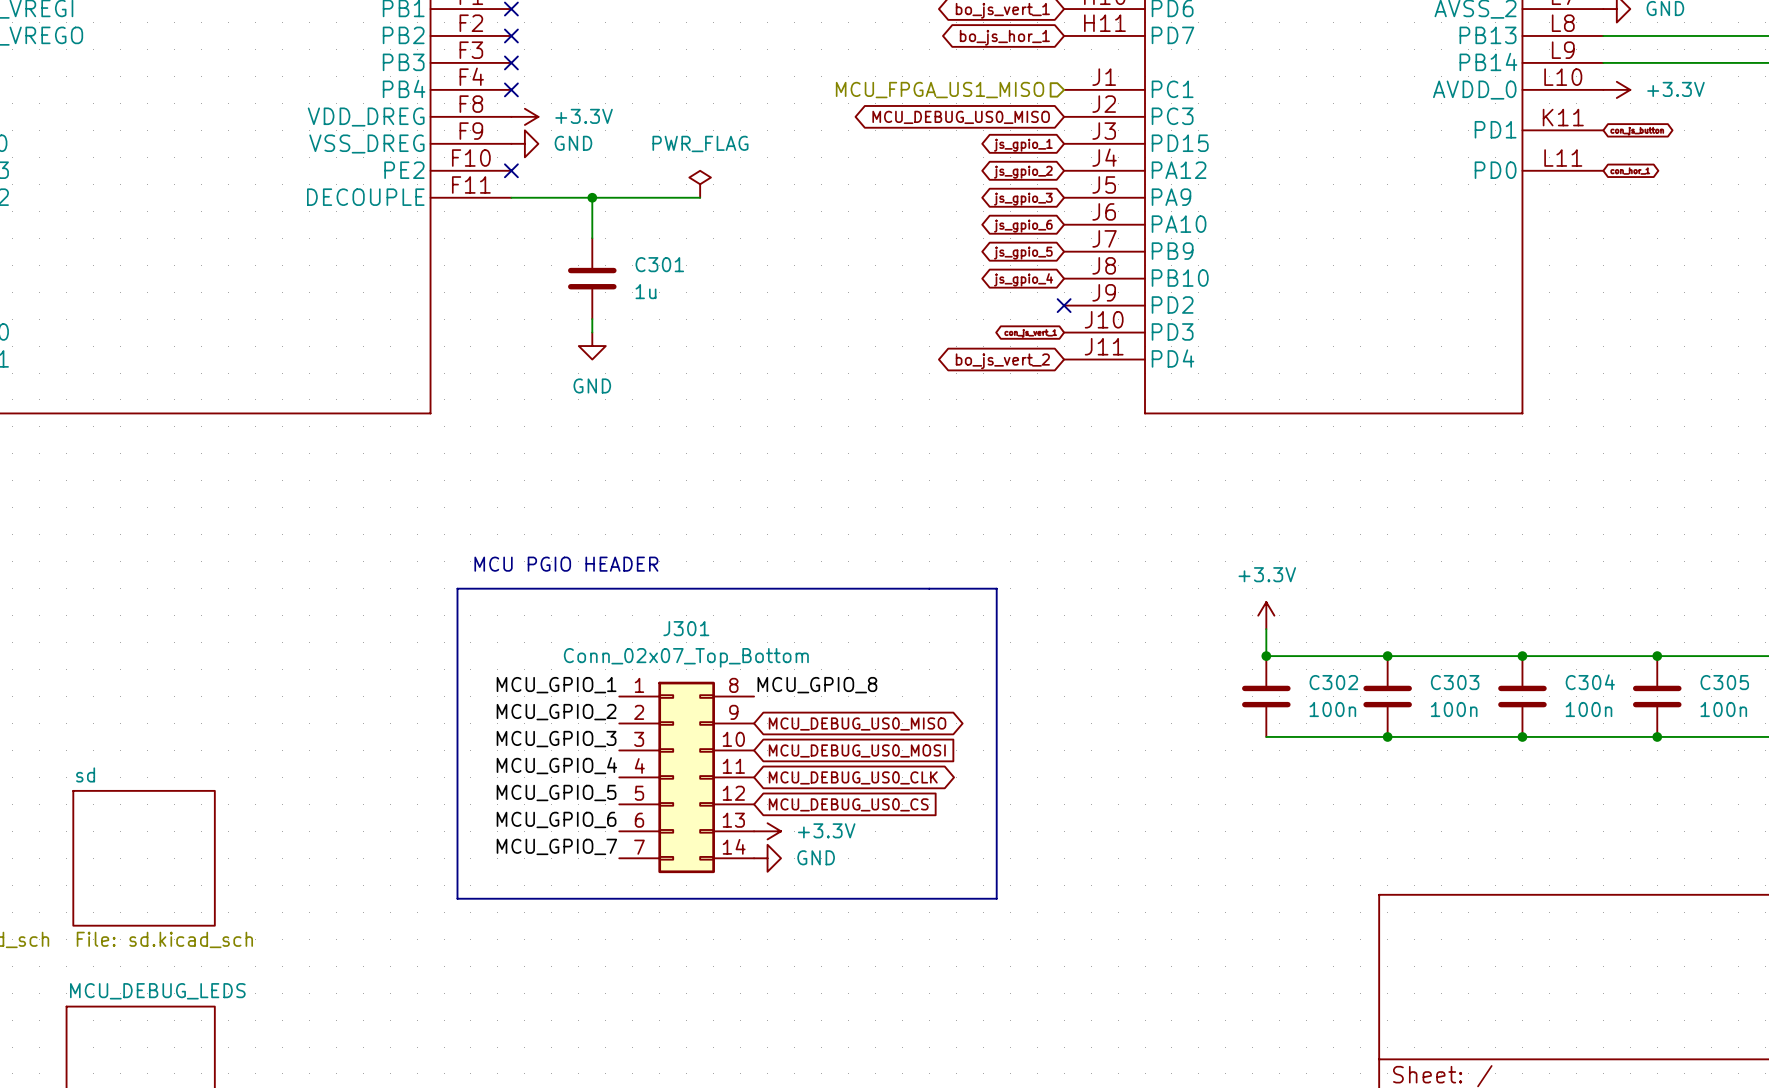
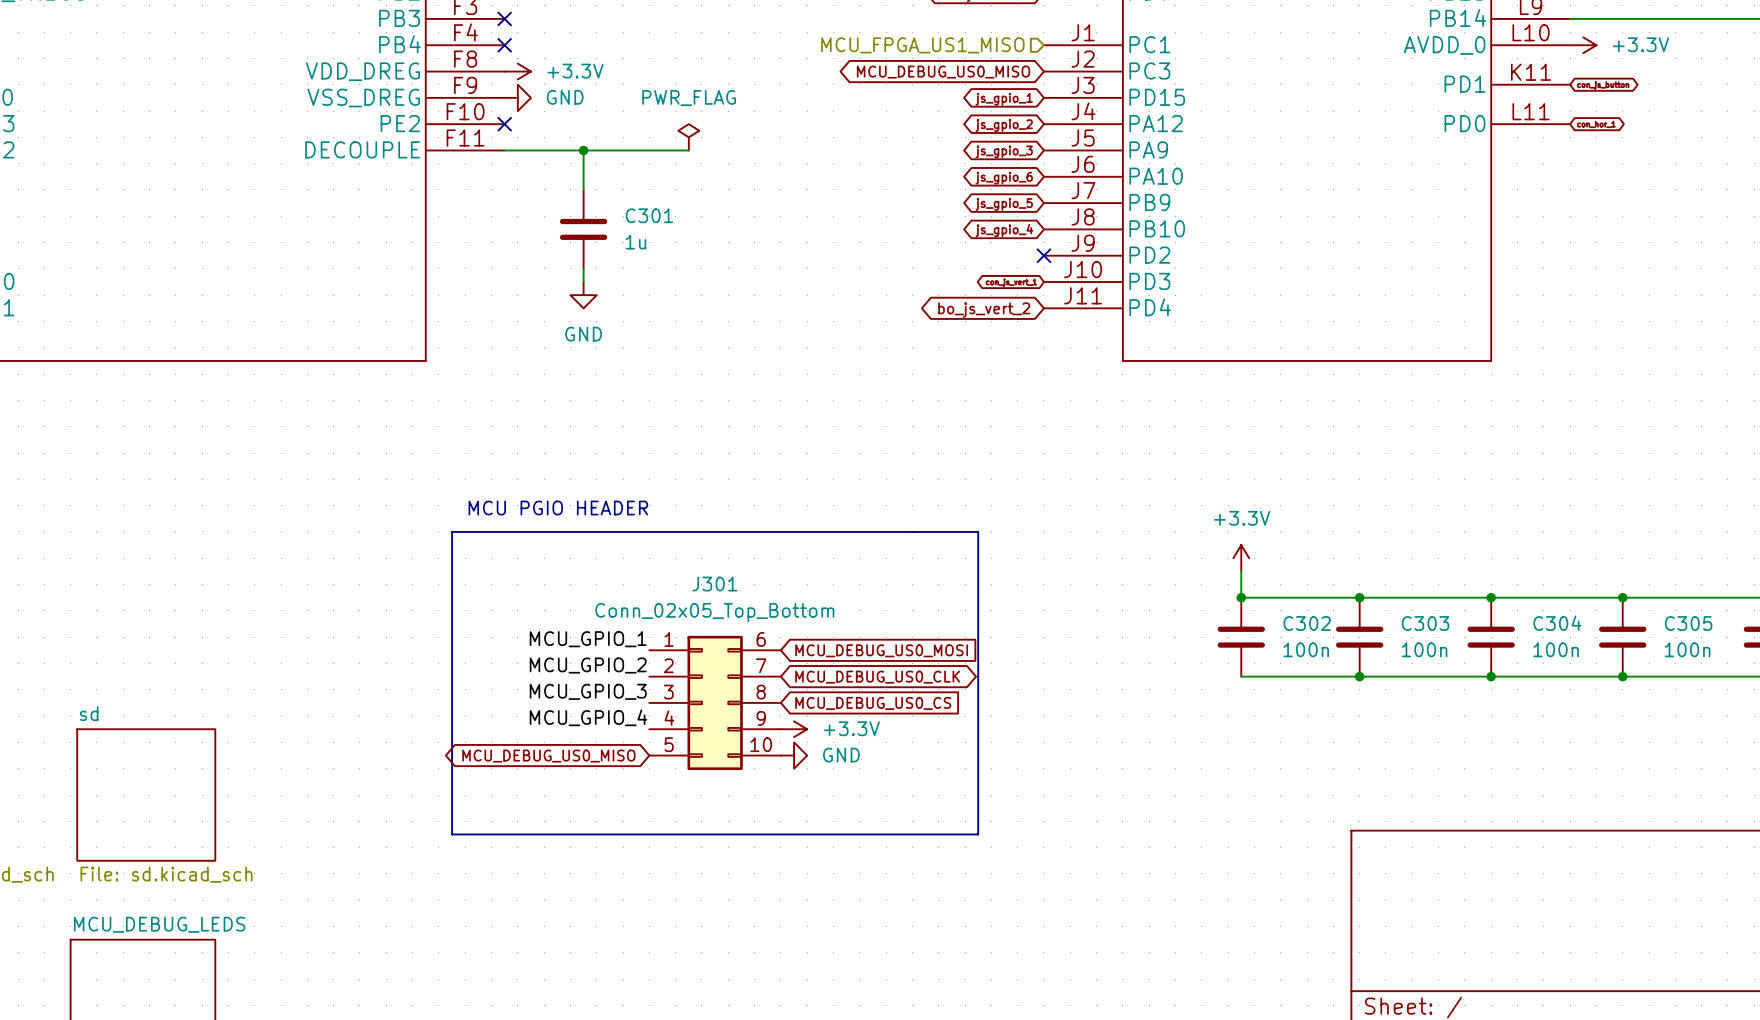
J301 name position: J301 (686, 628) -> J301 (714, 584)
J301 value: Conn_02x07_Top_Bottom (686, 657) -> Conn_02x05_Top_Bottom (714, 612)
J301 symbol: [619, 681, 755, 874] -> [649, 635, 781, 771]
label position: MCU_GPIO_1 (556, 685) -> MCU_GPIO_1 (588, 639)
label: MCU_GPIO_8 (817, 685) -> none
label position: MCU_GPIO_2 (556, 712) -> MCU_GPIO_2 (588, 665)
global label rotation: 0° (857, 724) -> 180° (548, 756)
global label position: MCU_DEBUG_US0_MISO (857, 724) -> MCU_DEBUG_US0_MISO (548, 756)
label position: MCU_GPIO_3 (556, 739) -> MCU_GPIO_3 (588, 691)
global label position: MCU_DEBUG_US0_MOSI (857, 750) -> MCU_DEBUG_US0_MOSI (881, 650)
label position: MCU_GPIO_4 (556, 765) -> MCU_GPIO_4 (588, 717)
global label position: MCU_DEBUG_US0_CLK (853, 777) -> MCU_DEBUG_US0_CLK (877, 677)
label: MCU_GPIO_5 (556, 792) -> none
global label position: MCU_DEBUG_US0_CS (848, 804) -> MCU_DEBUG_US0_CS (873, 703)
label: MCU_GPIO_6 (556, 819) -> none
power symbol position: +3.3V (767, 831) -> +3.3V (794, 729)
label: MCU_GPIO_7 (556, 846) -> none
power symbol position: GND (767, 858) -> GND (794, 755)

